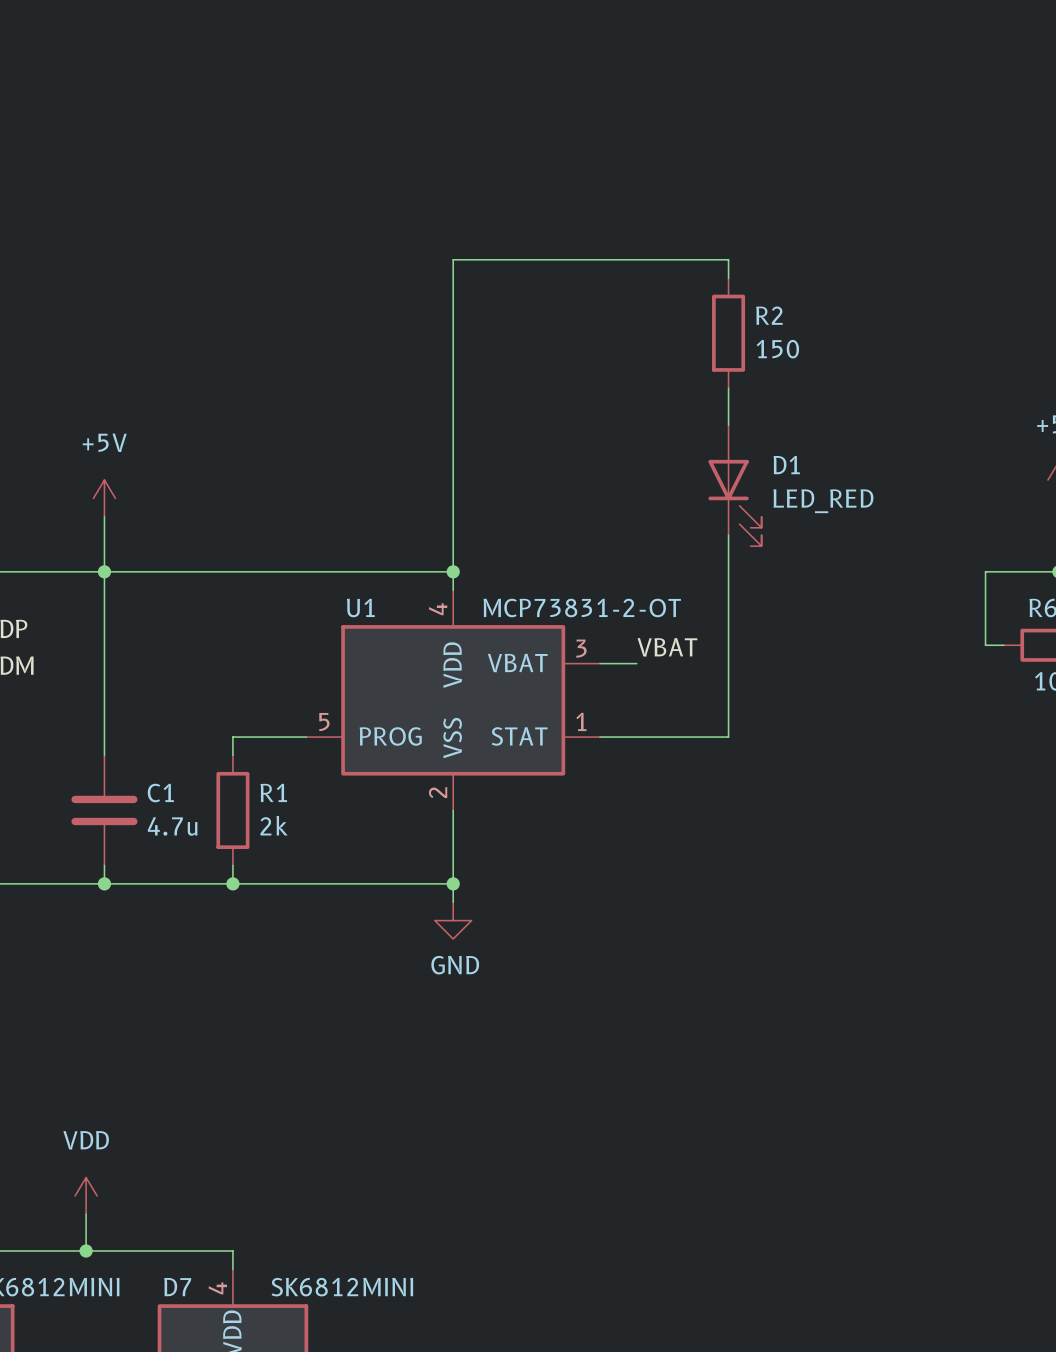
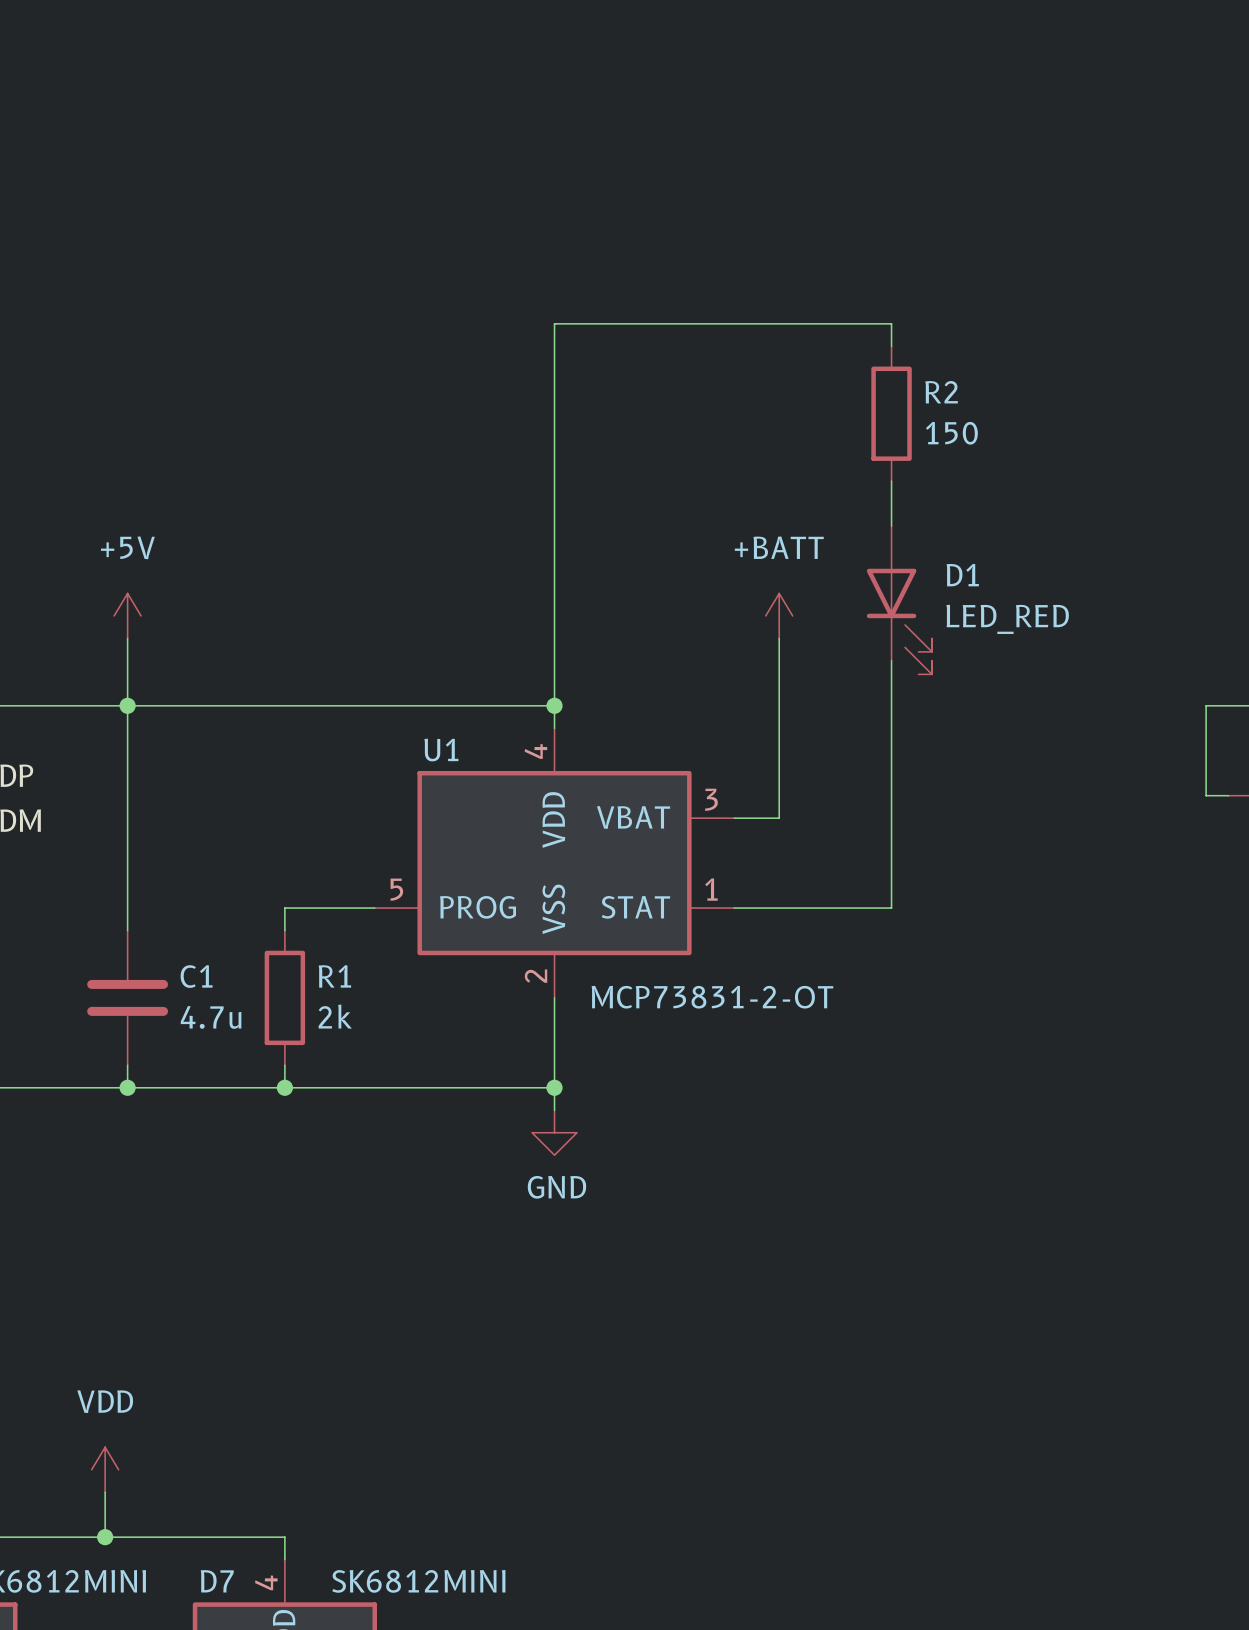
power symbol: none -> +BATT (779, 615)
wire: none -> (779, 638) (779, 818)
U1 value position: MCP73831-2-OT (582, 607) -> MCP73831-2-OT (712, 997)
label: VBAT (667, 647) -> none

